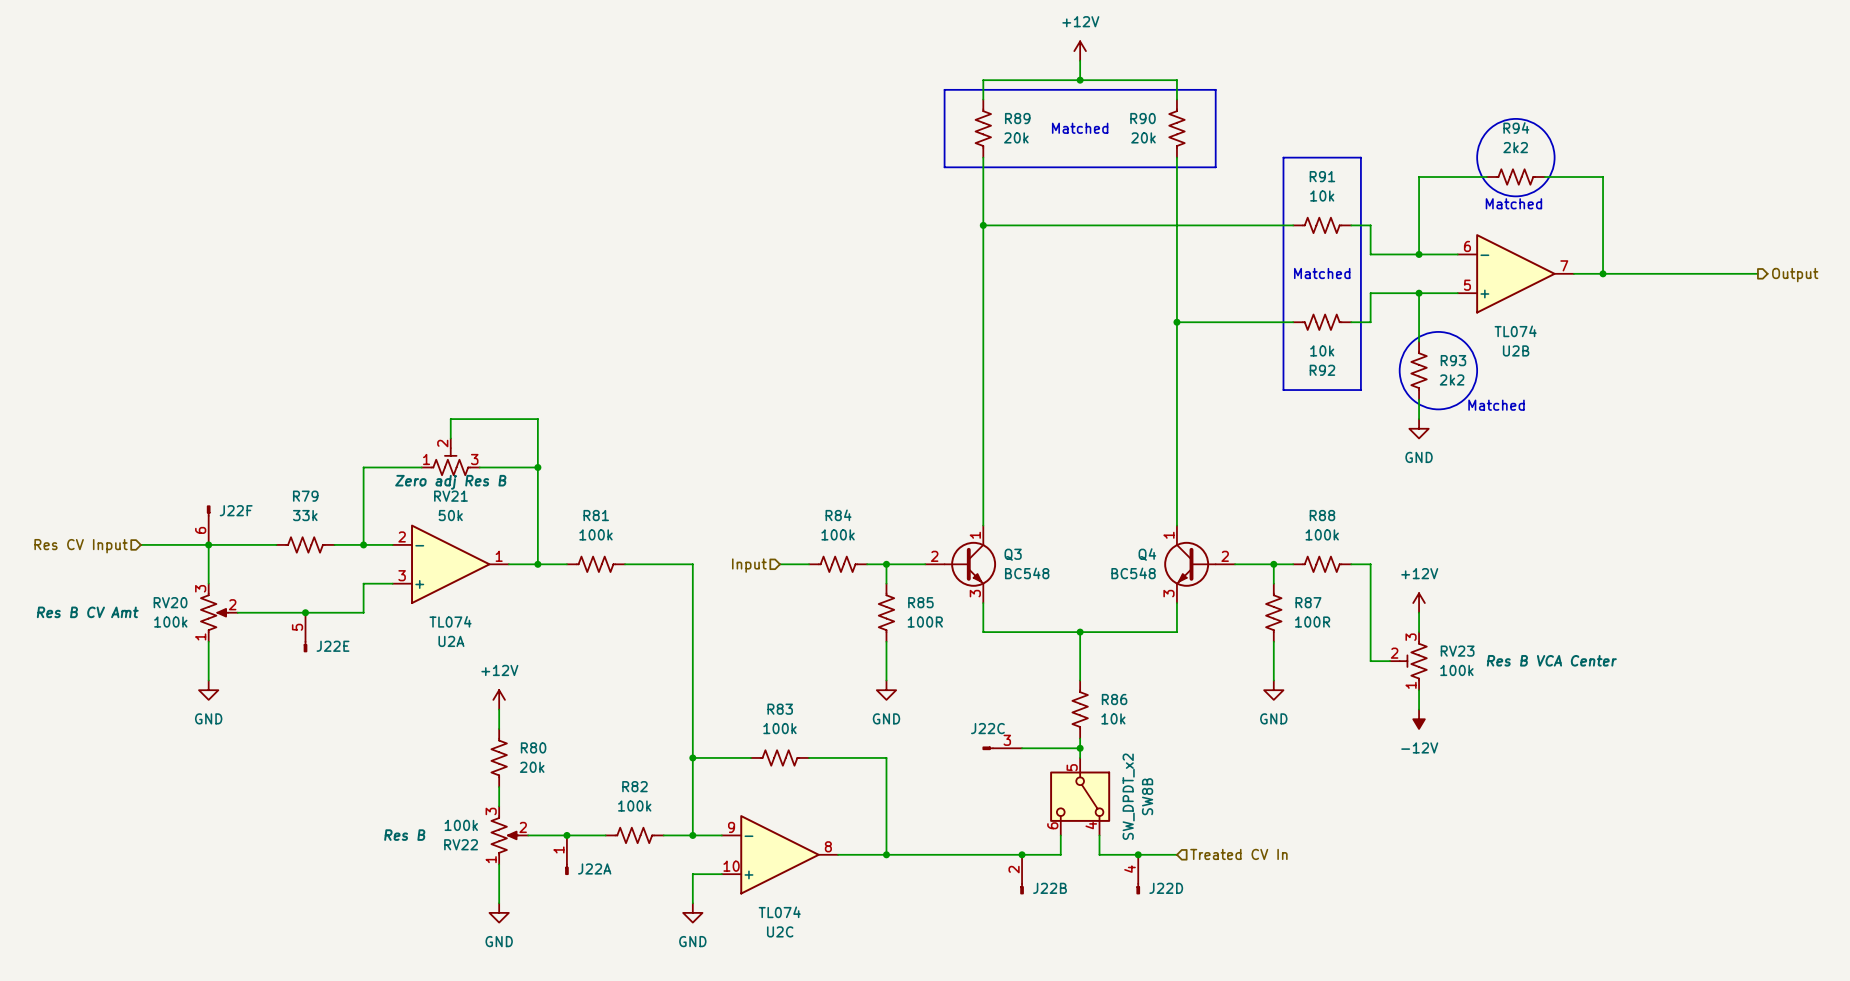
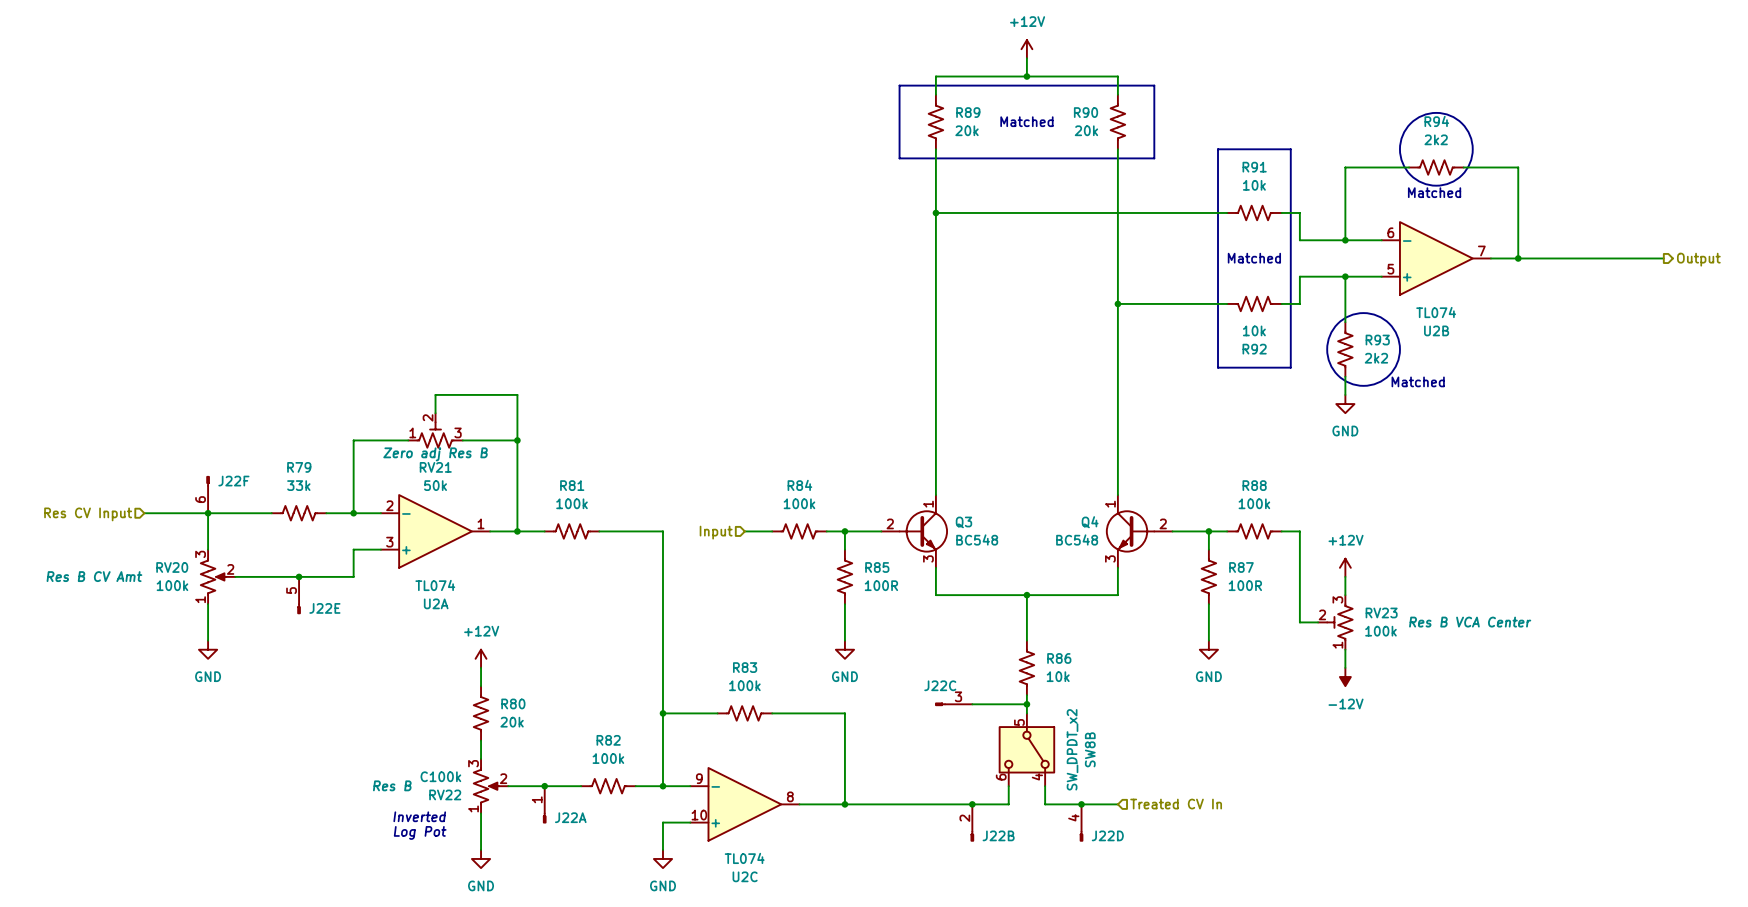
RV22 value: 100k (461, 825) -> C100k (440, 776)
text: none -> Inverted (419, 816)
text: none -> Log Pot (420, 832)

